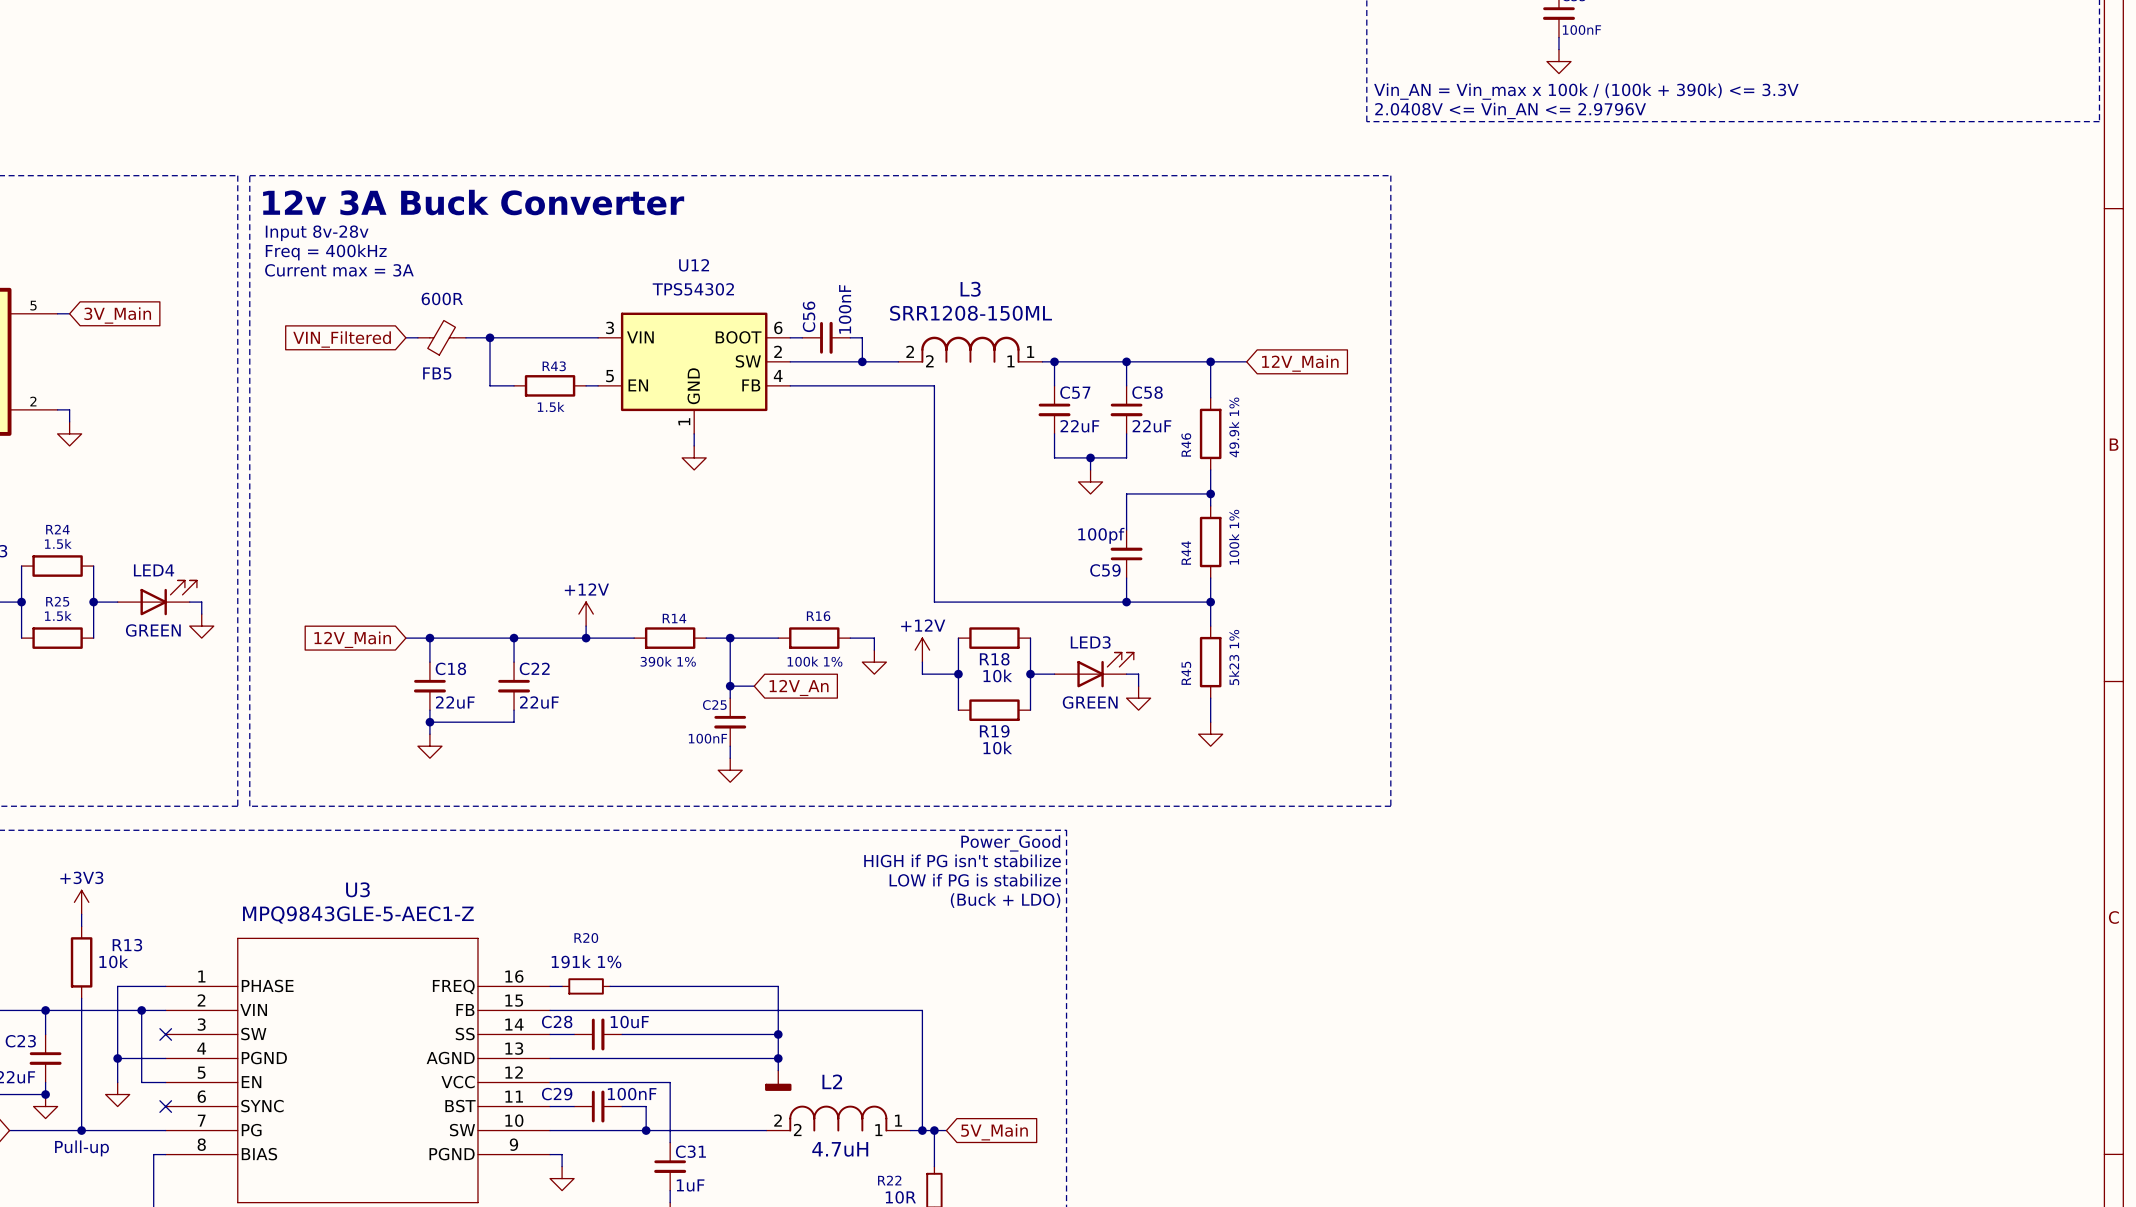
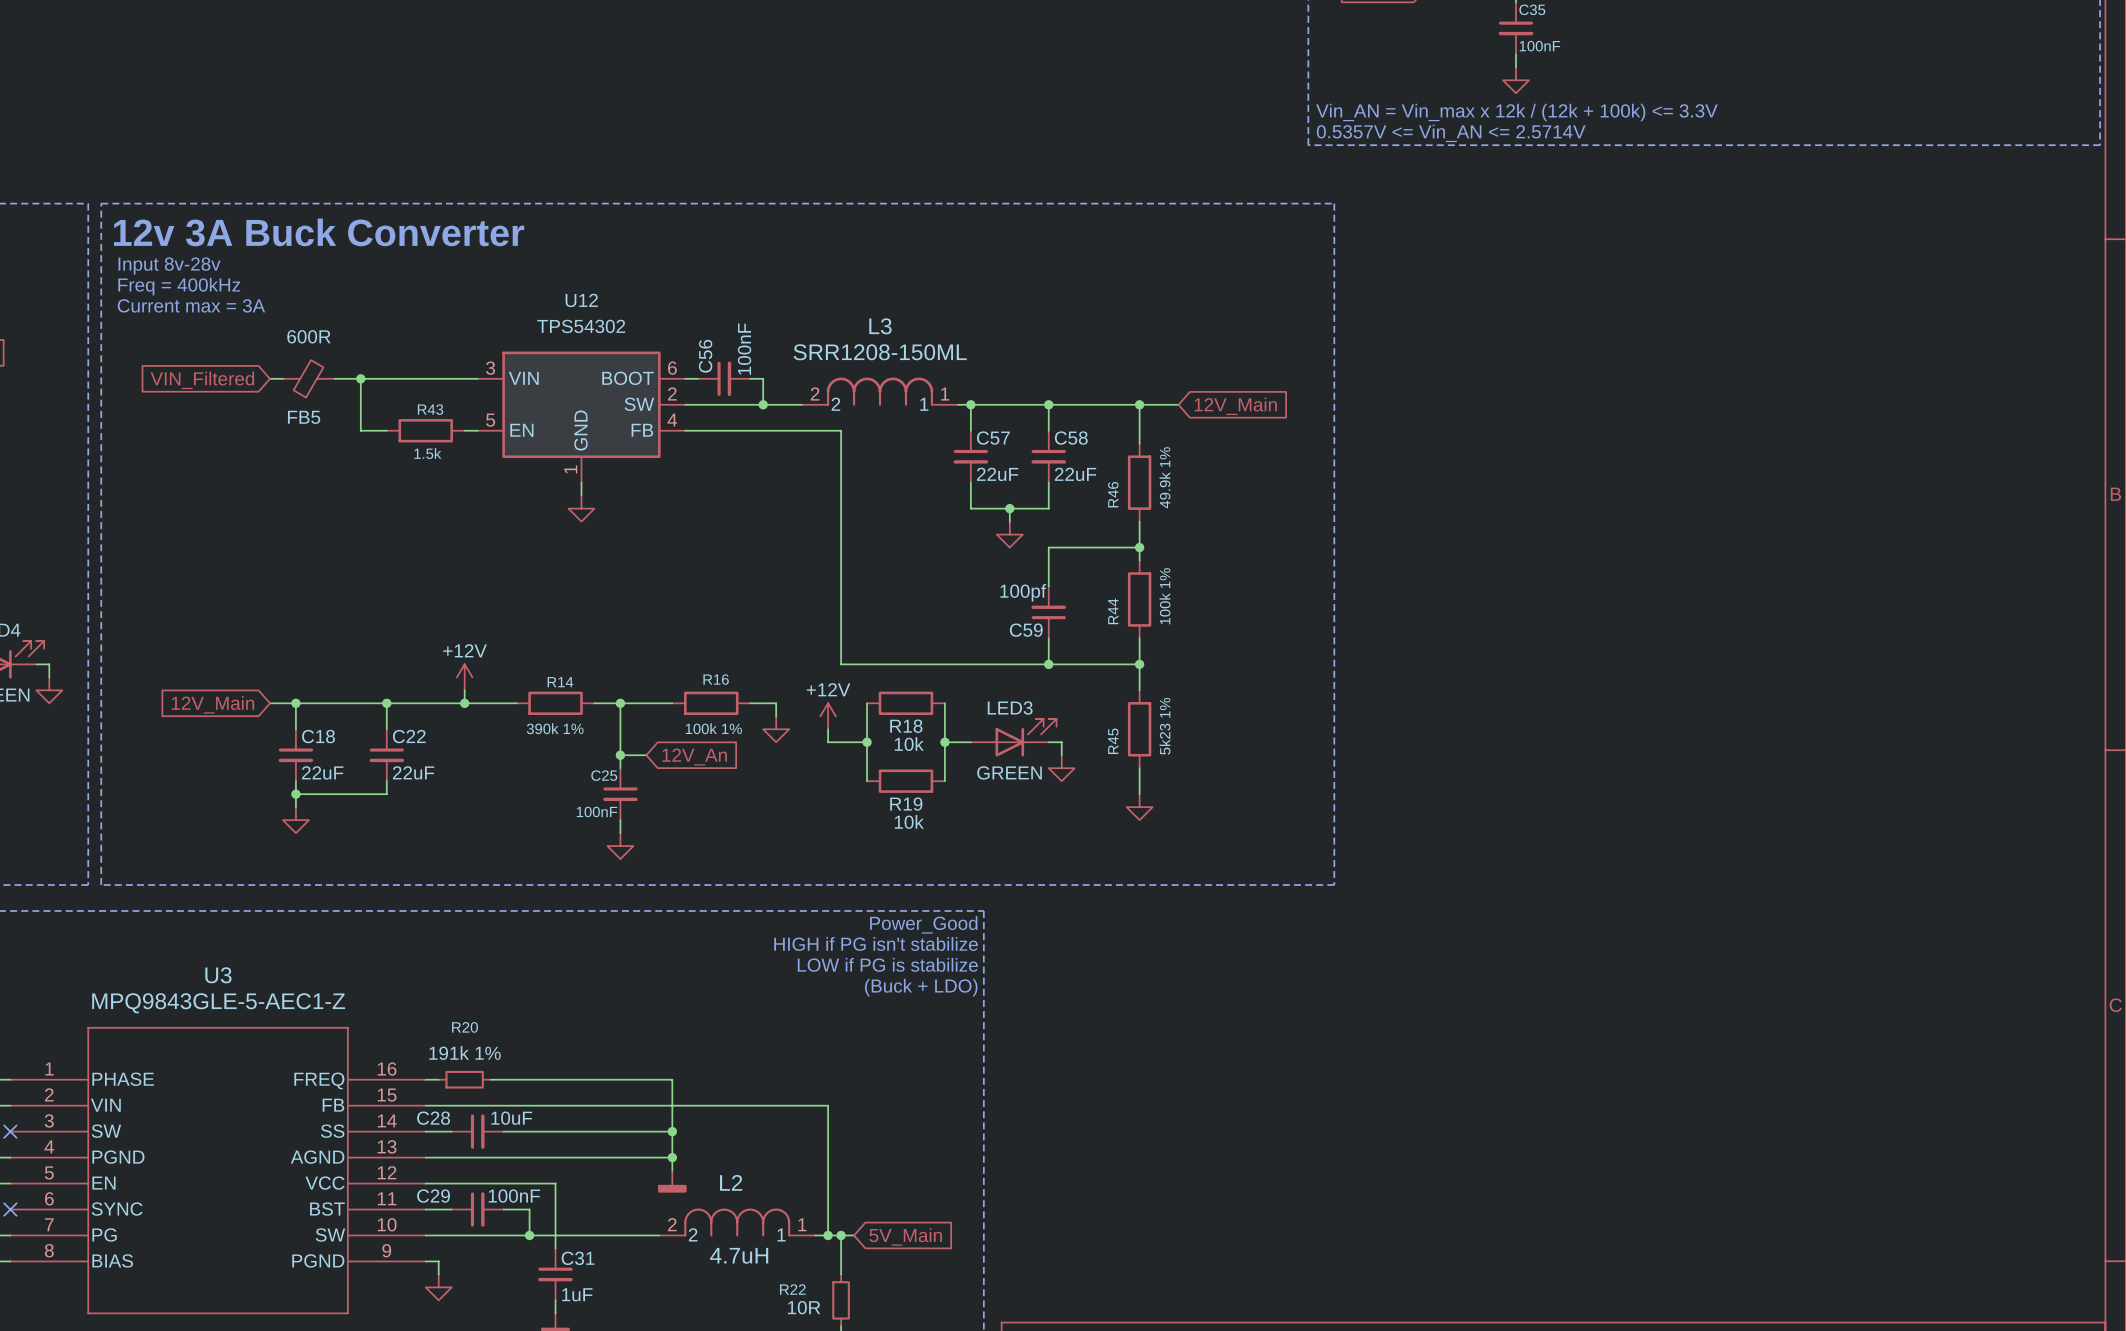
text: Vin_AN = Vin_max x 100k / (100k + 390k) <= 3.3V (1586, 91) -> Vin_AN = Vin_max x 12k / (12k + 100k) <= 3.3V (1516, 112)
text: 2.0408V <= Vin_AN <= 2.9796V (1510, 110) -> 0.5357V <= Vin_AN <= 2.5714V (1451, 133)

